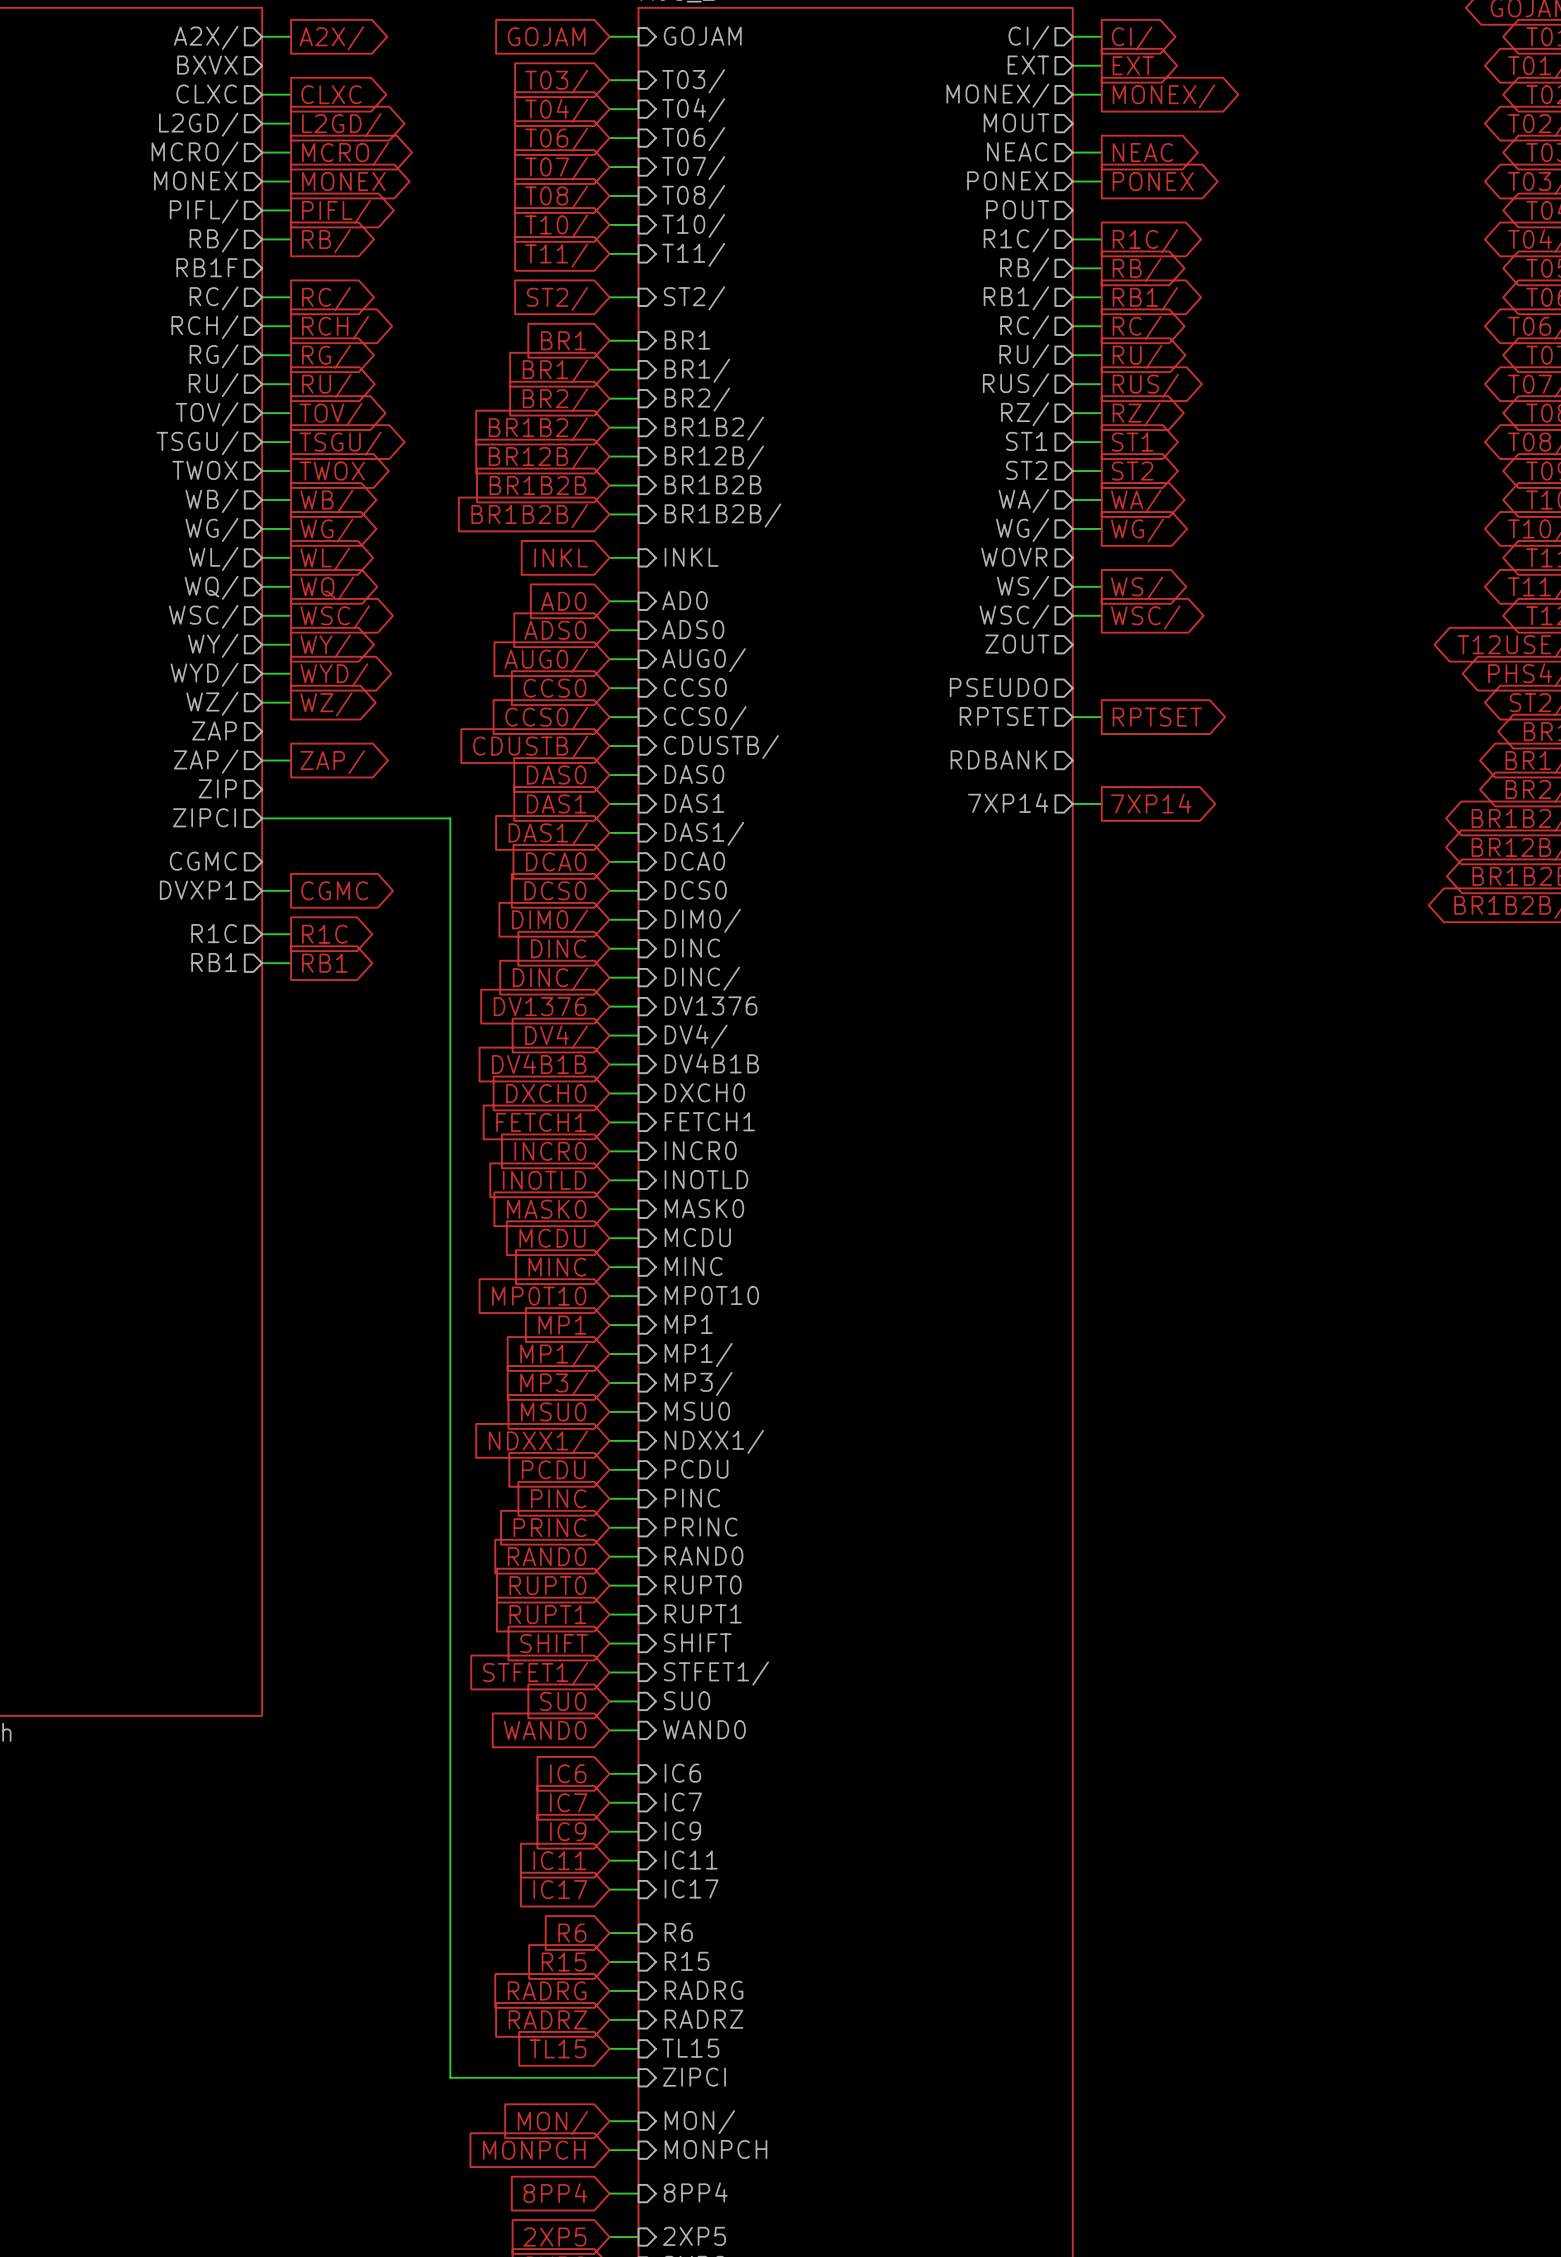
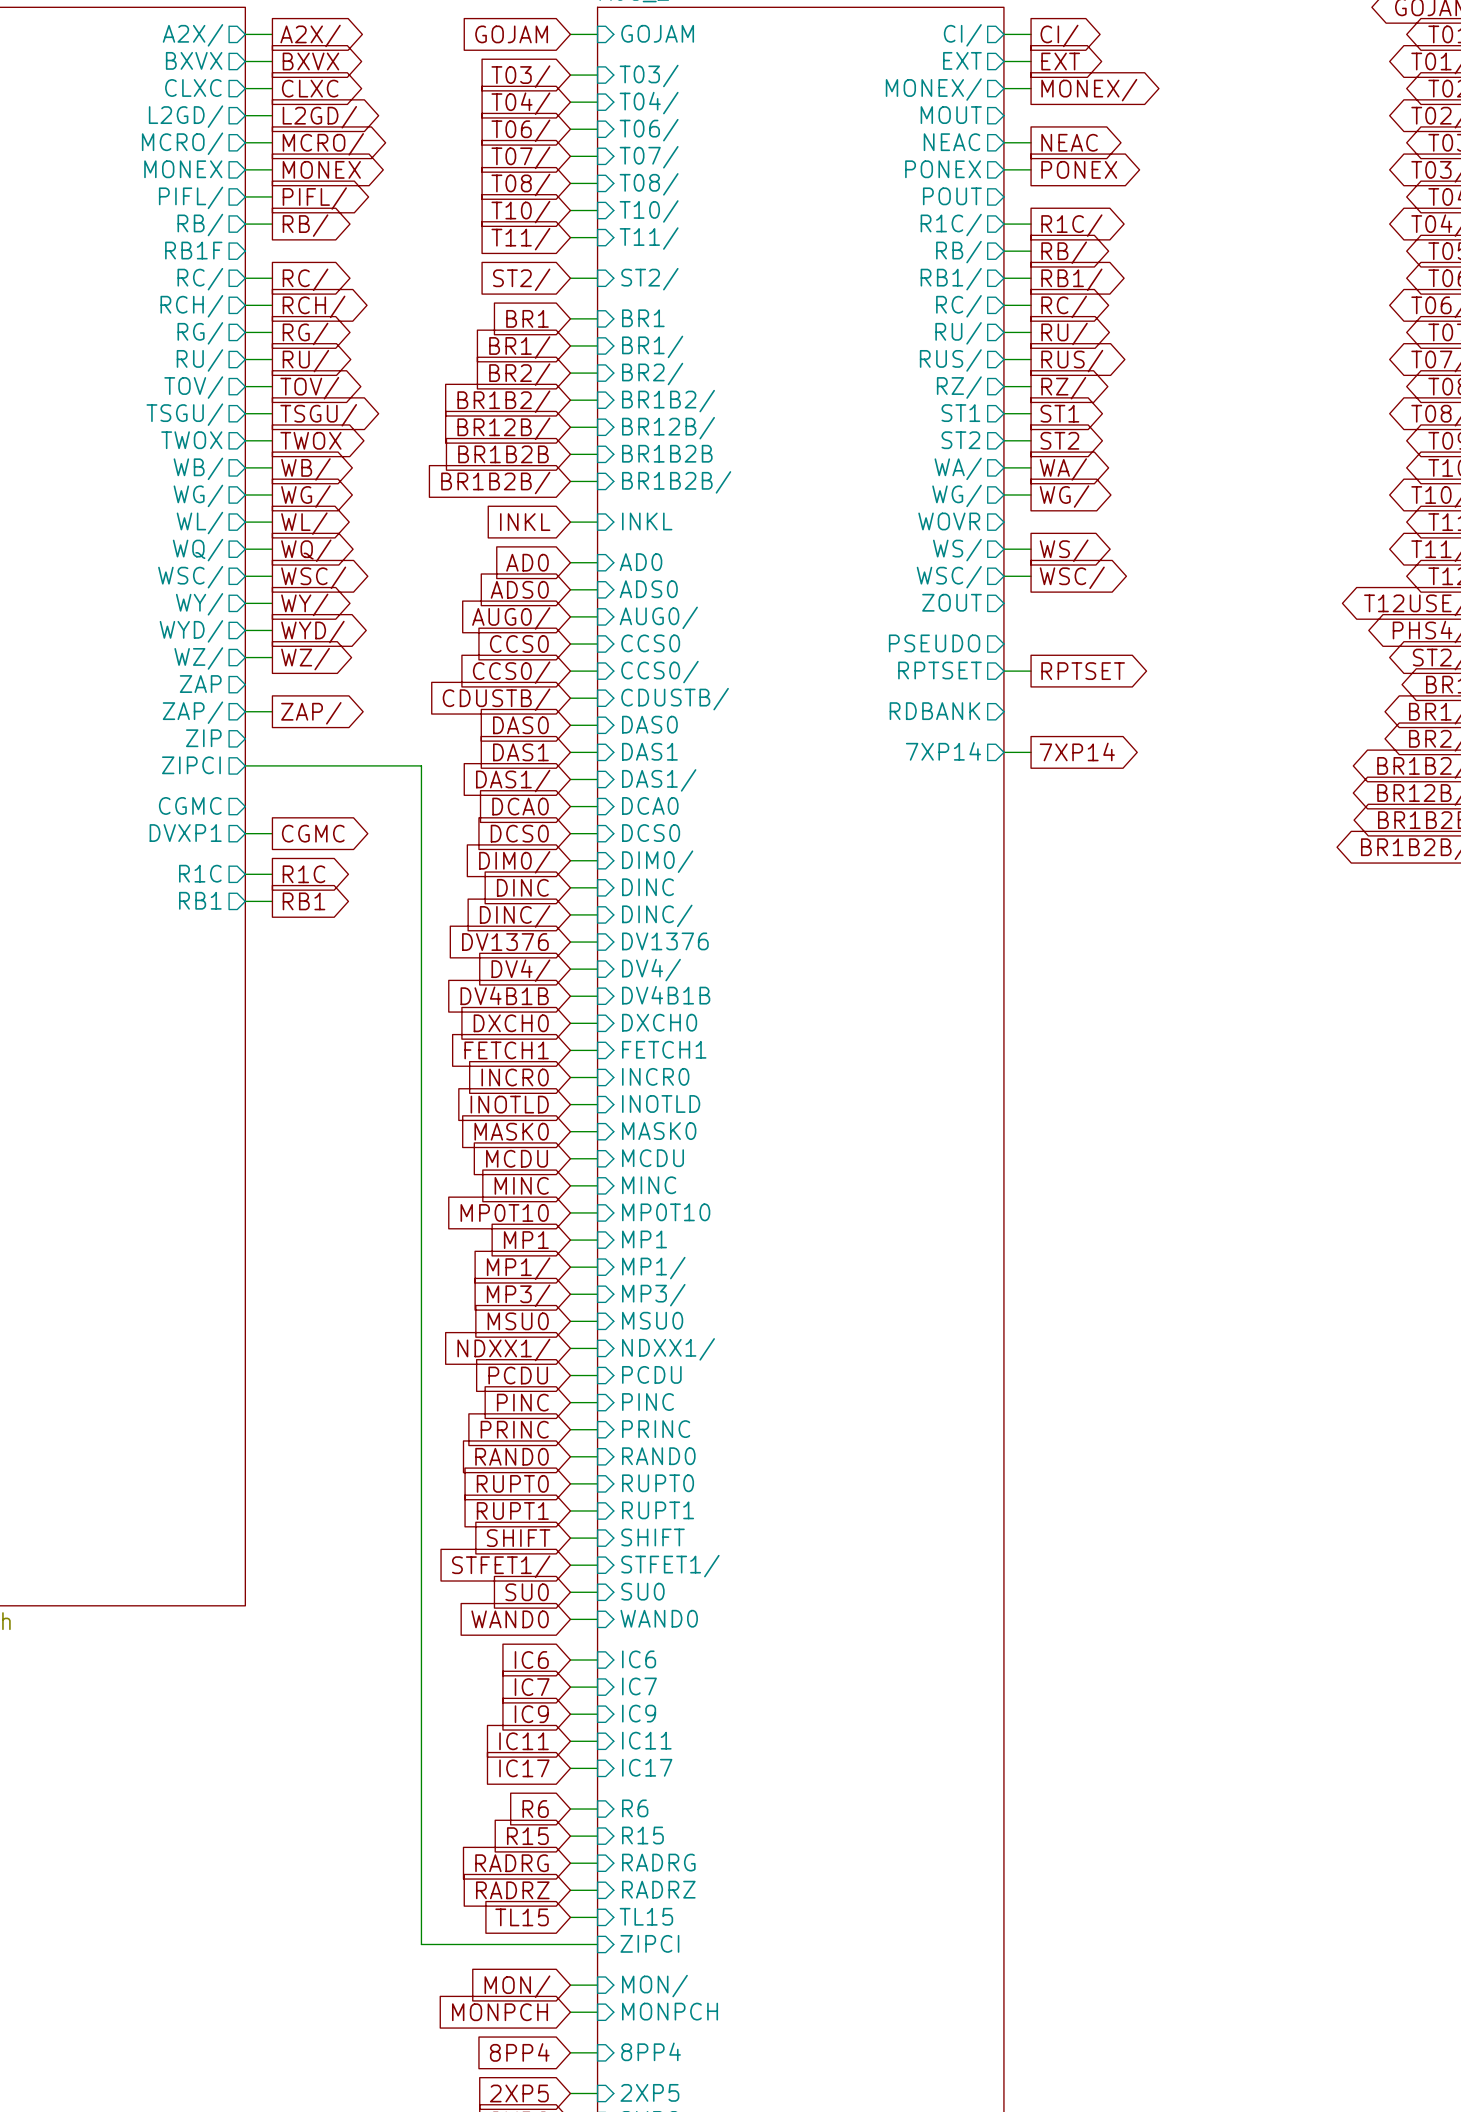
wire: none -> (245, 61) (272, 61)
global label: none -> BXVX (310, 61)

